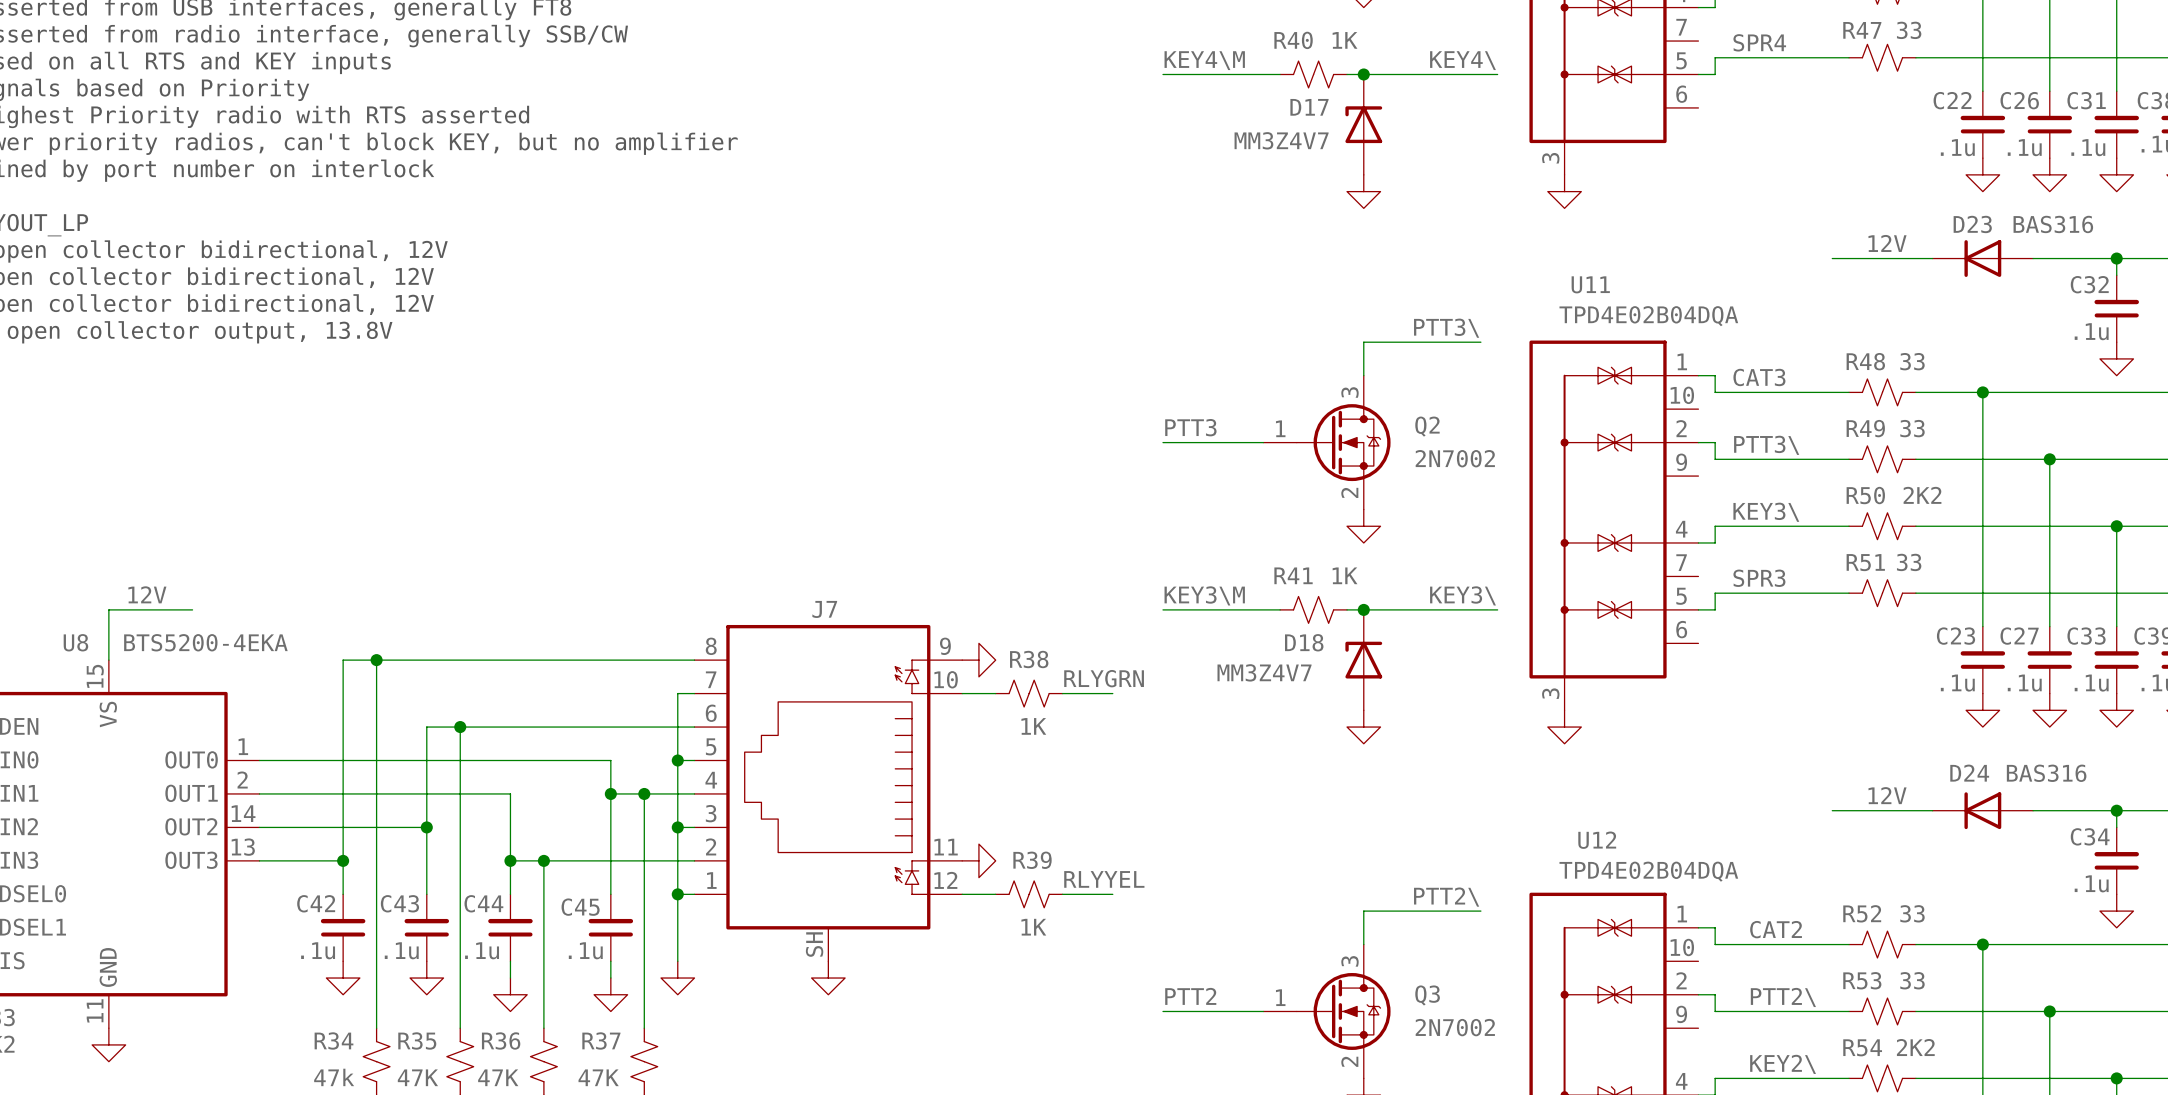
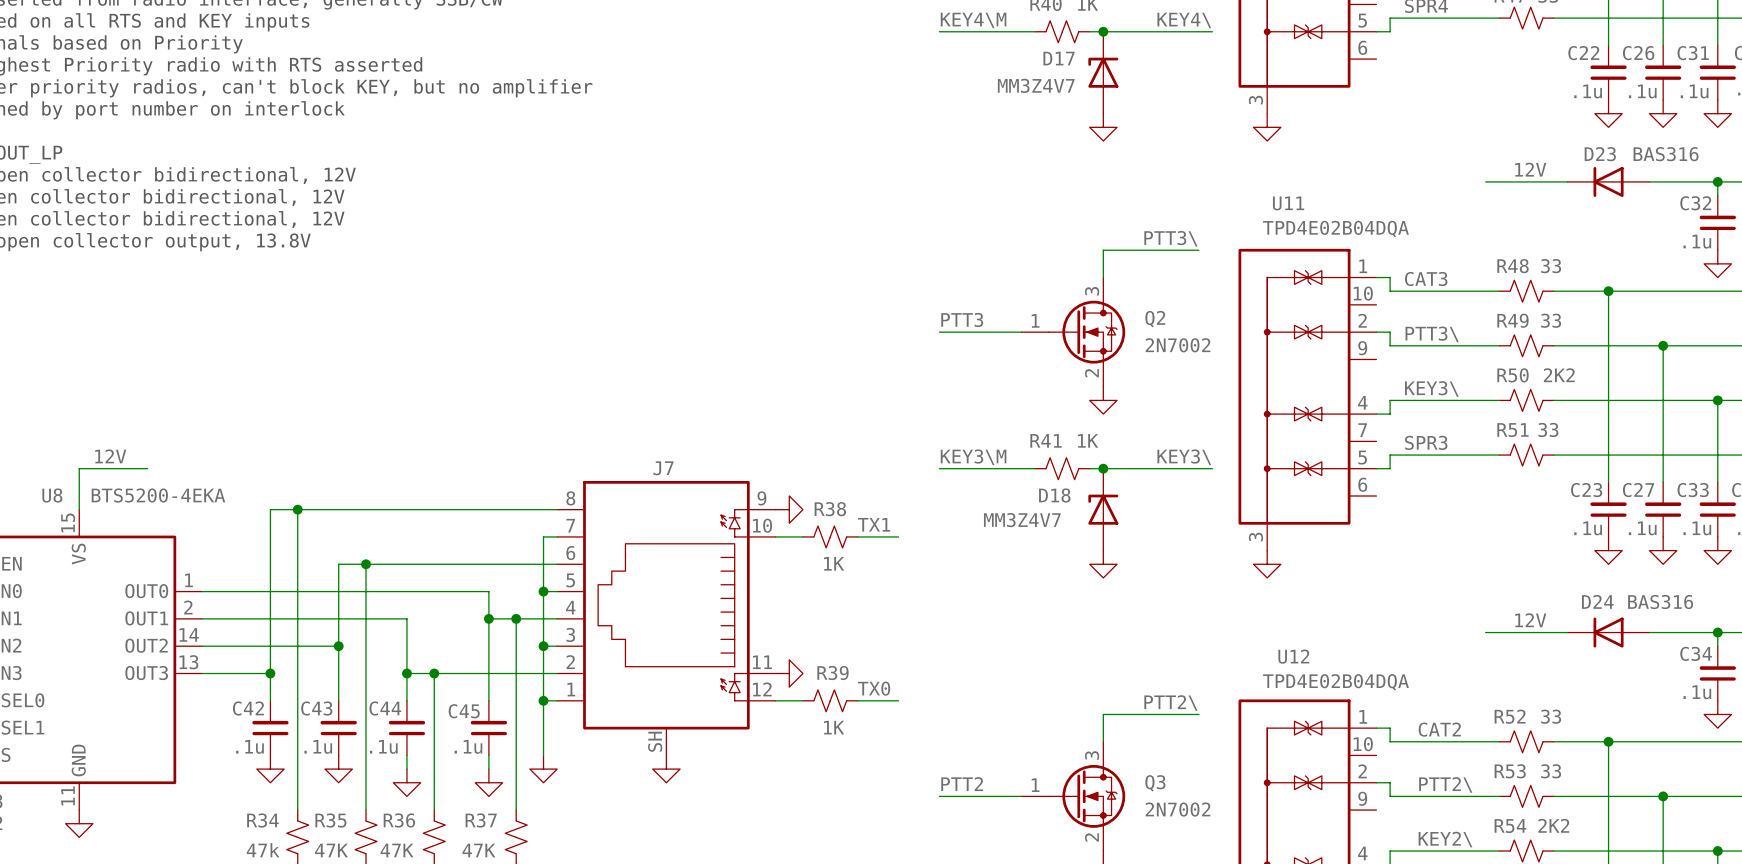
label: RLYGRN (1104, 678) -> TX1 (874, 524)
label: RLYYEL (1104, 879) -> TX0 (874, 688)

